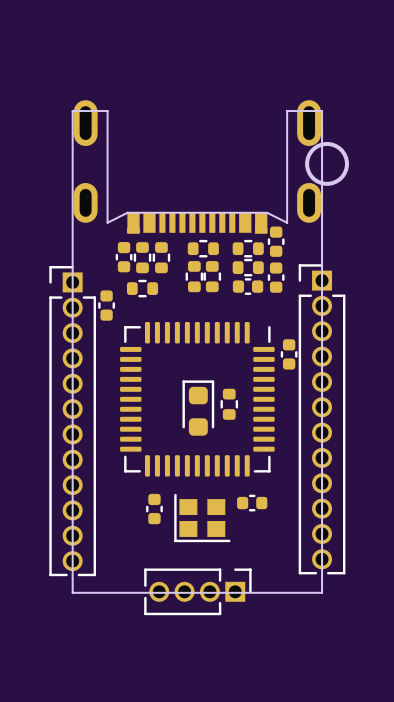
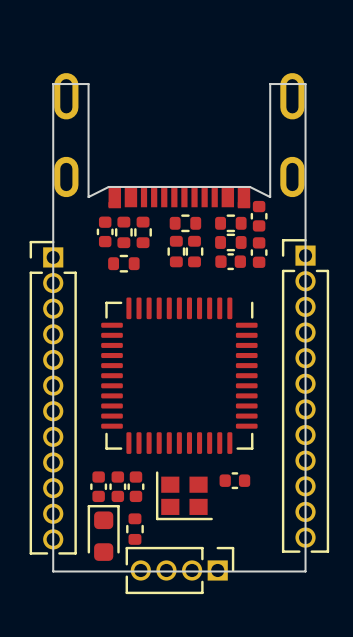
round board edge: [305, 141, 349, 186] -> none
part: (106, 305) -> none
part: (289, 354) -> none
part position: (229, 404) -> (134, 529)
part position: (198, 408) -> (103, 532)
part: none -> (98, 486)
part: none -> (117, 486)

